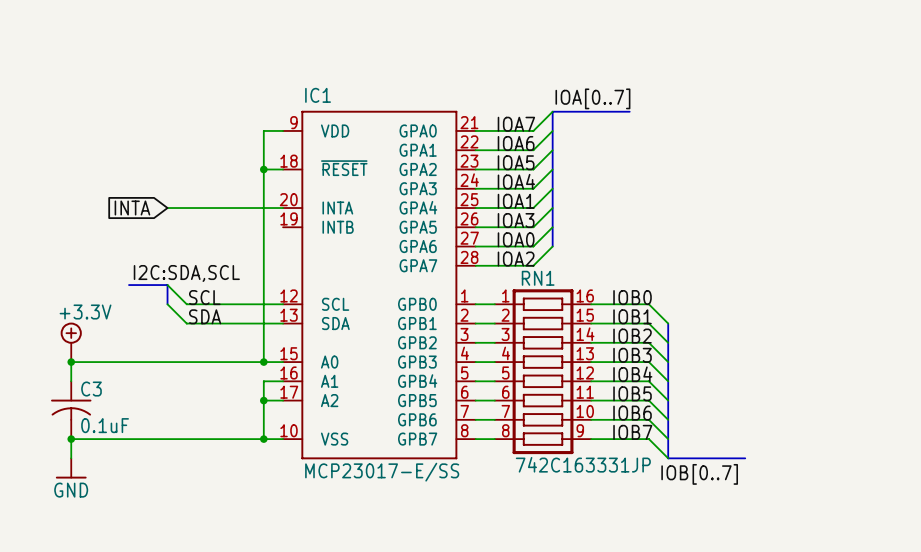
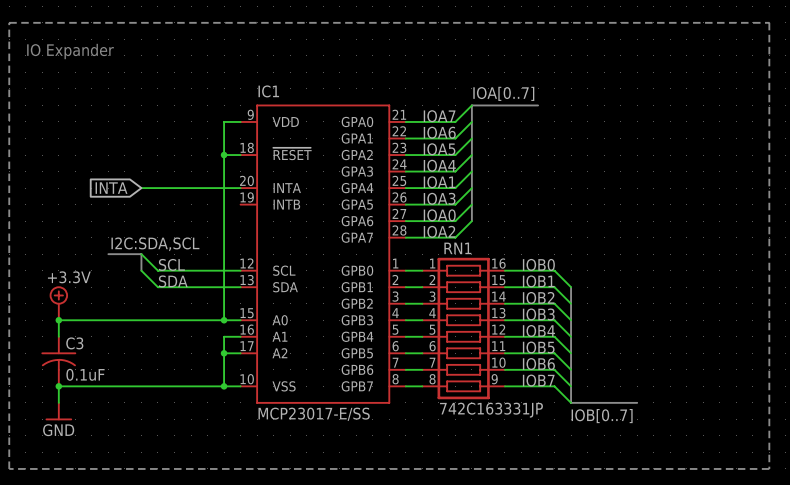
line: none -> (9, 22) (769, 22) (769, 468) (9, 468) (9, 22)
text: none -> IO Expander (70, 51)

